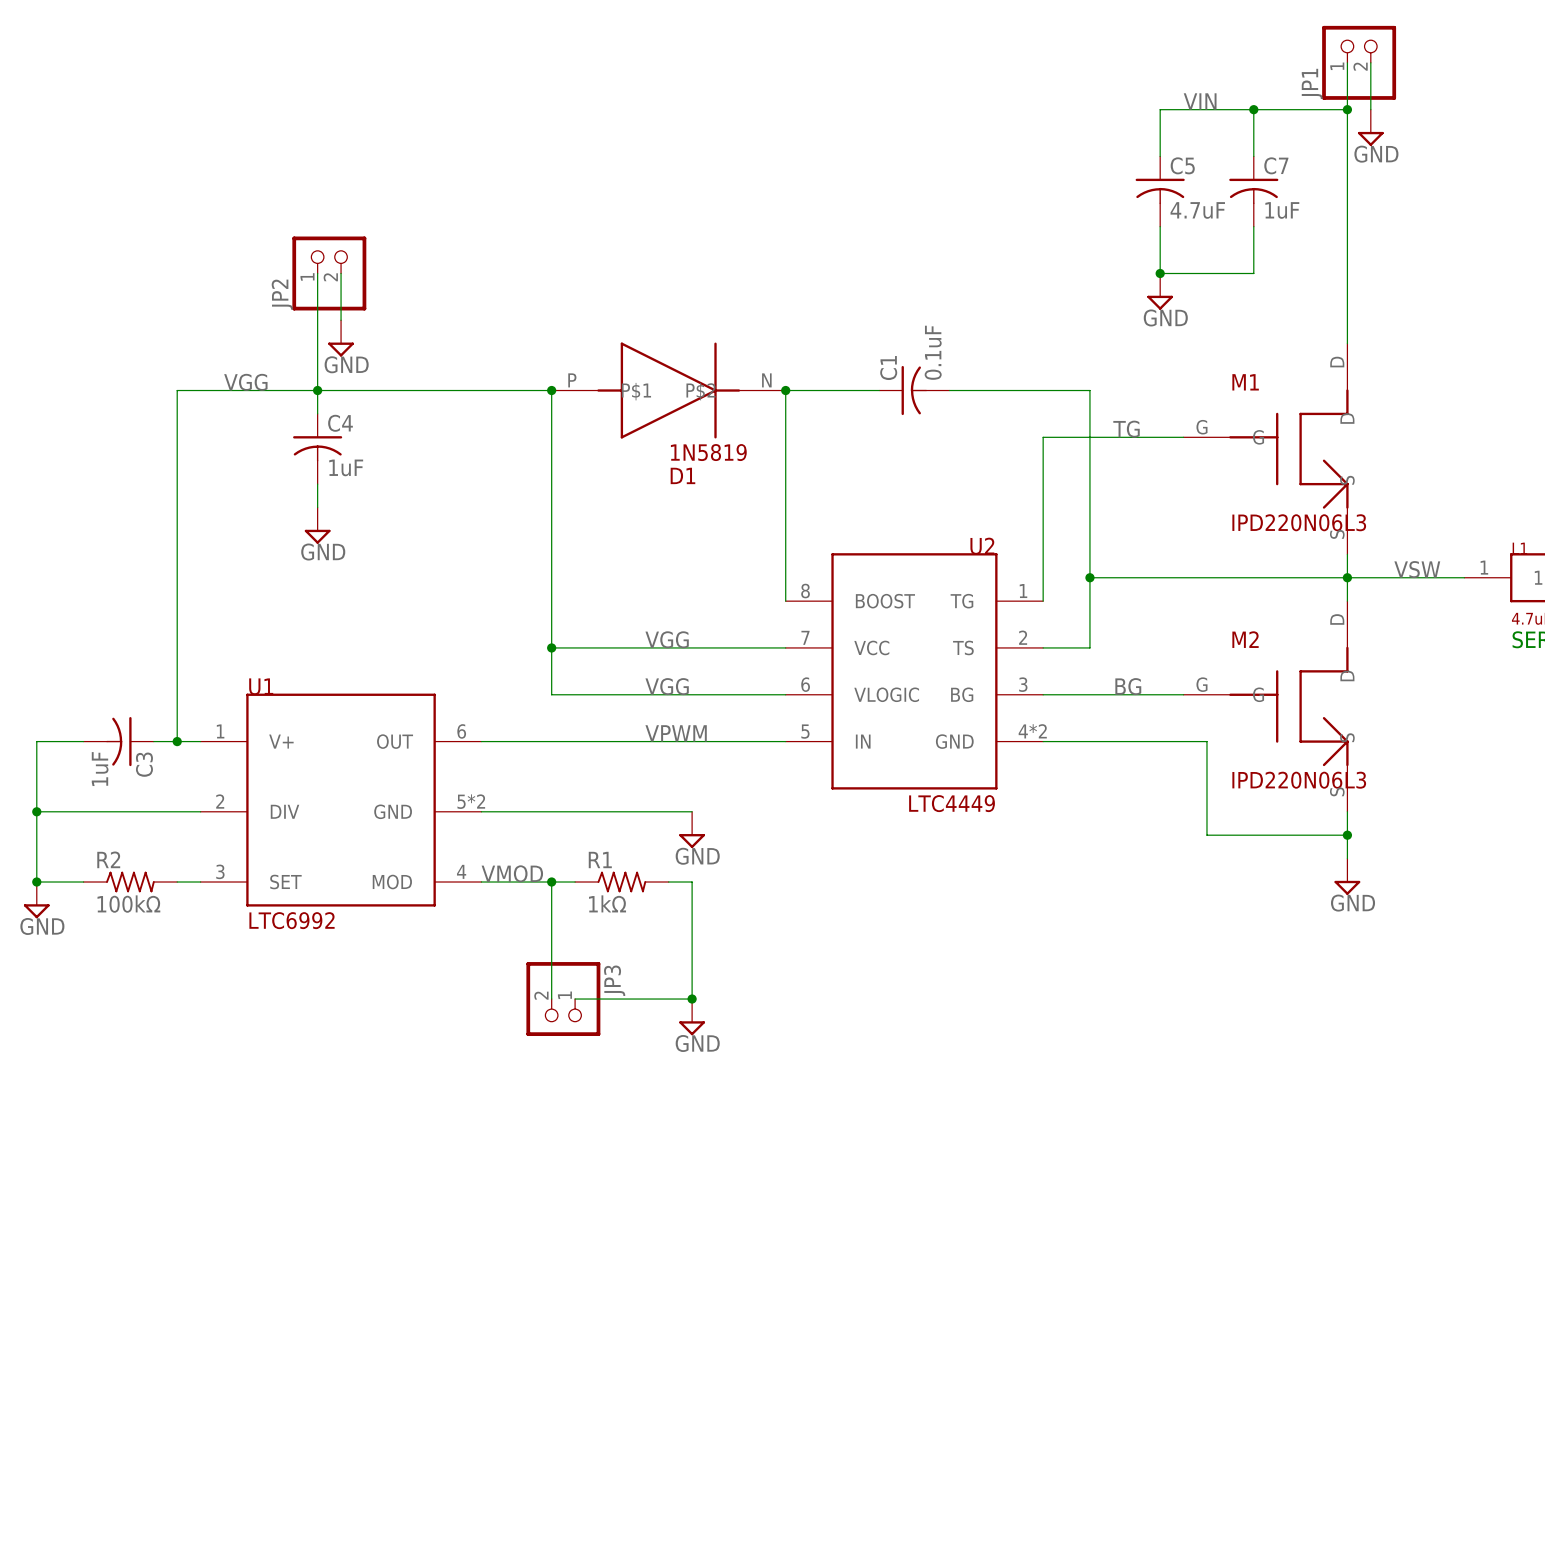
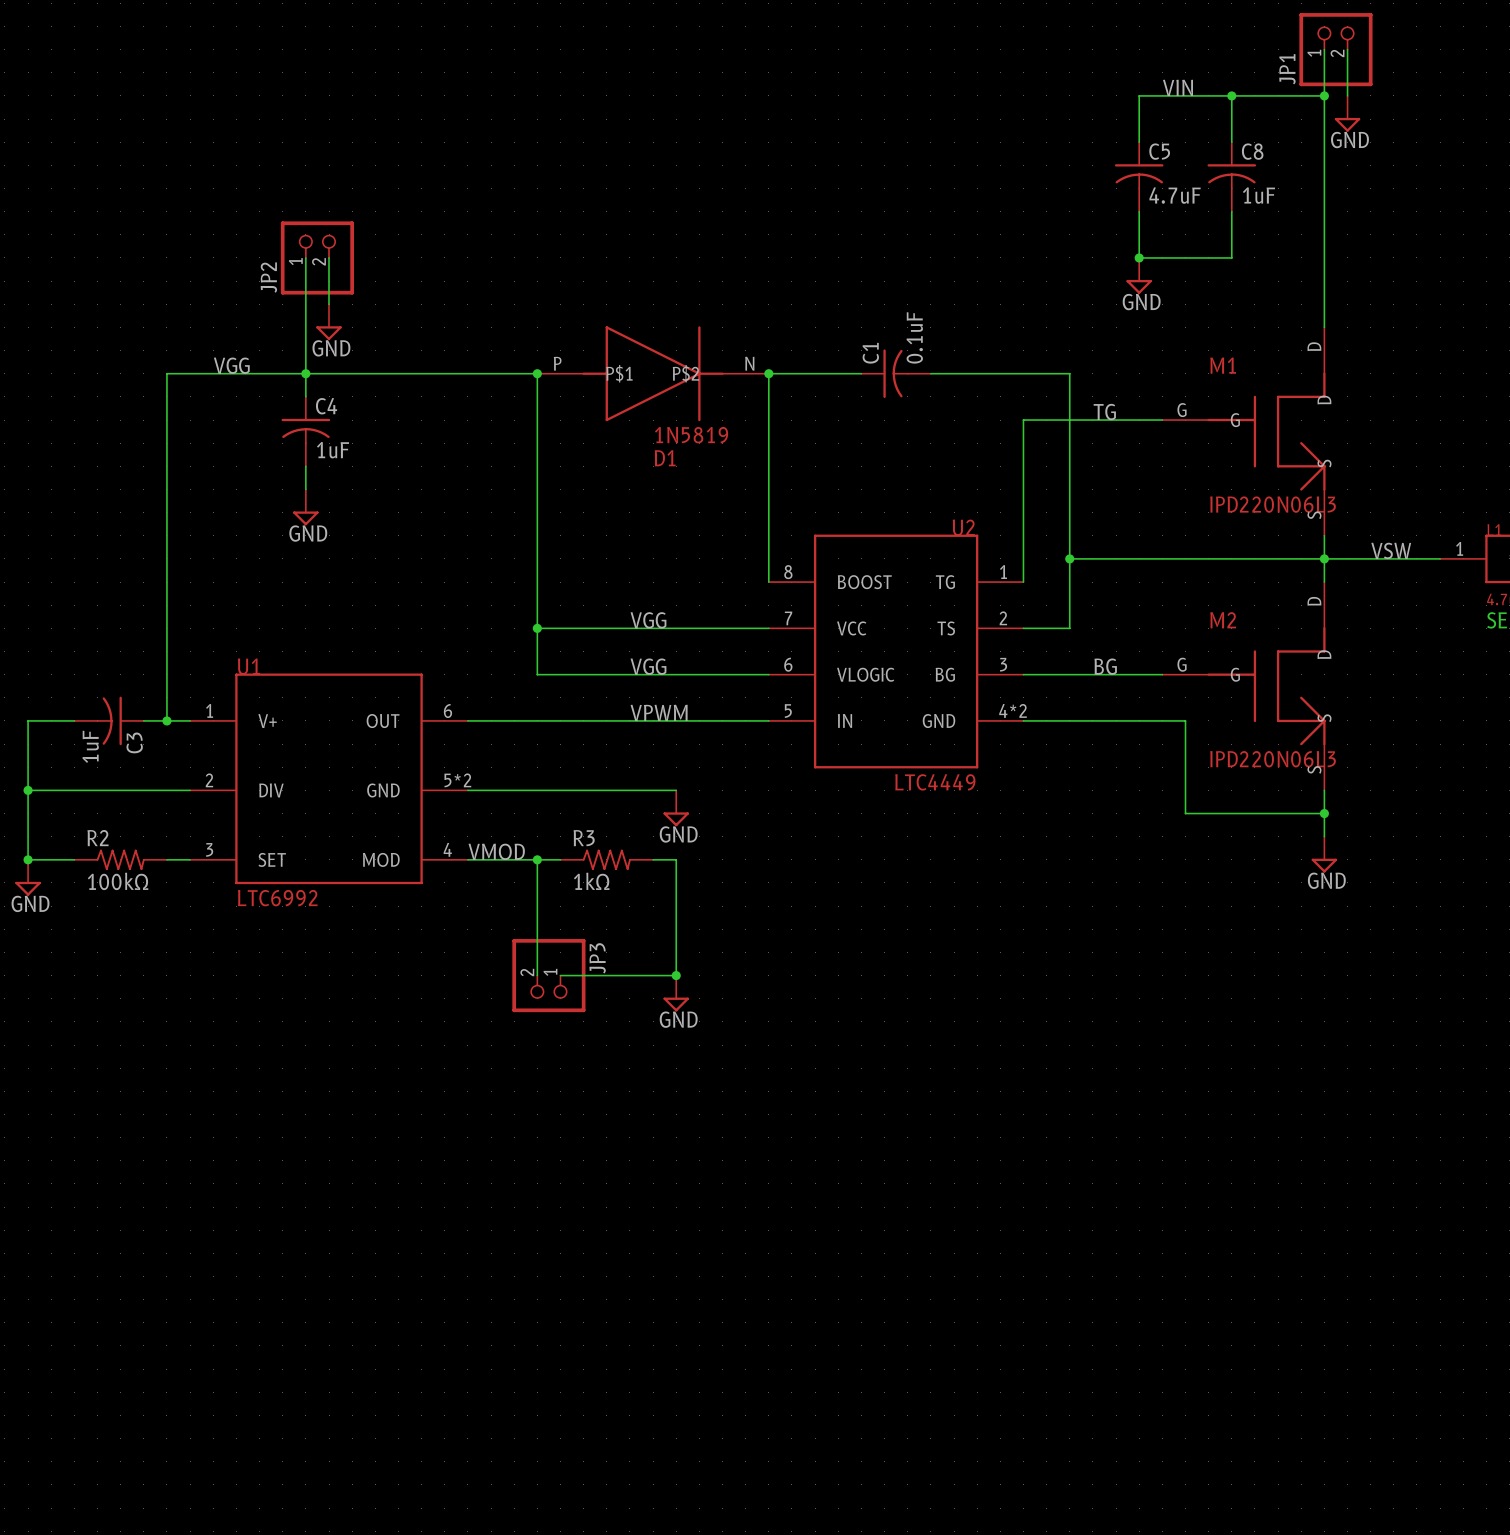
C7 name: C7 (1276, 165) -> C8 (1252, 151)
R1 name: R1 (600, 860) -> R3 (584, 838)

